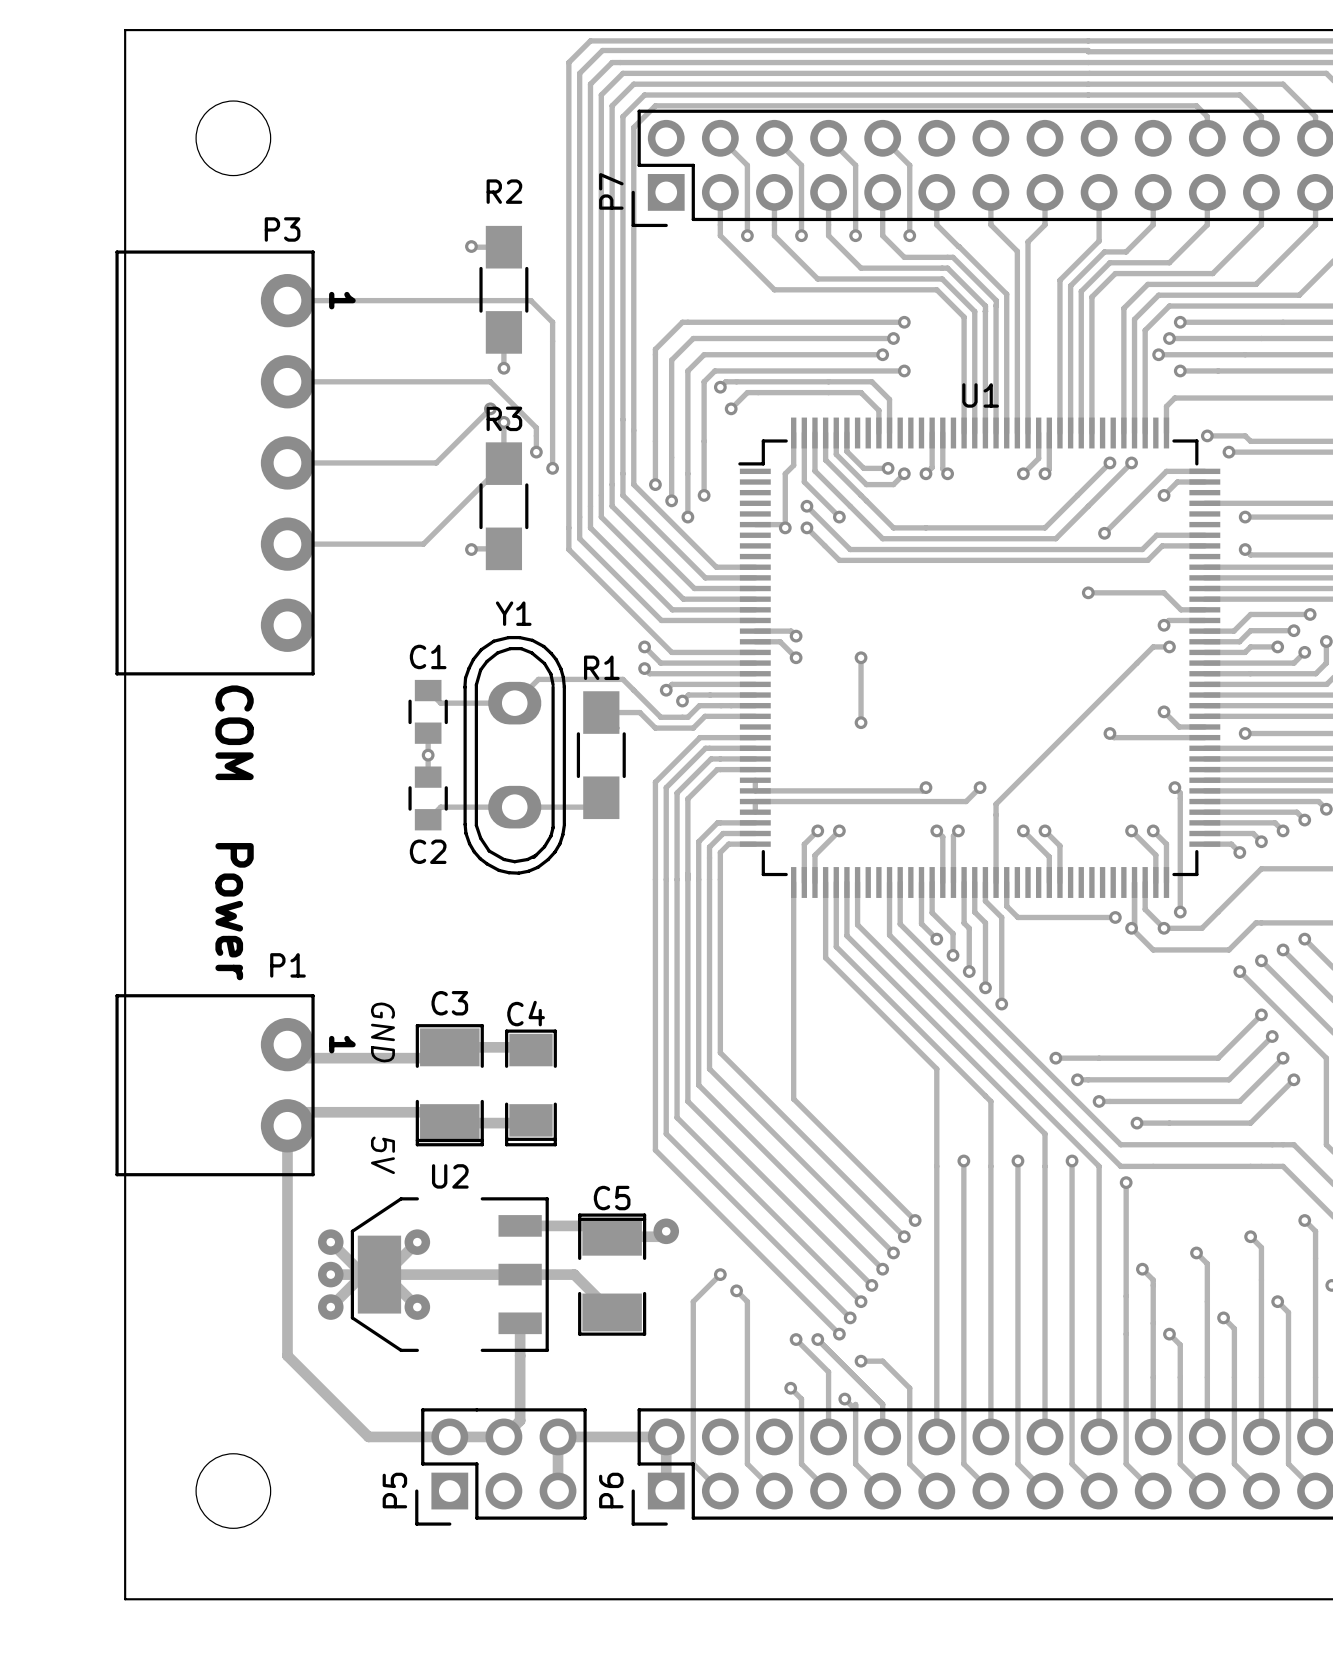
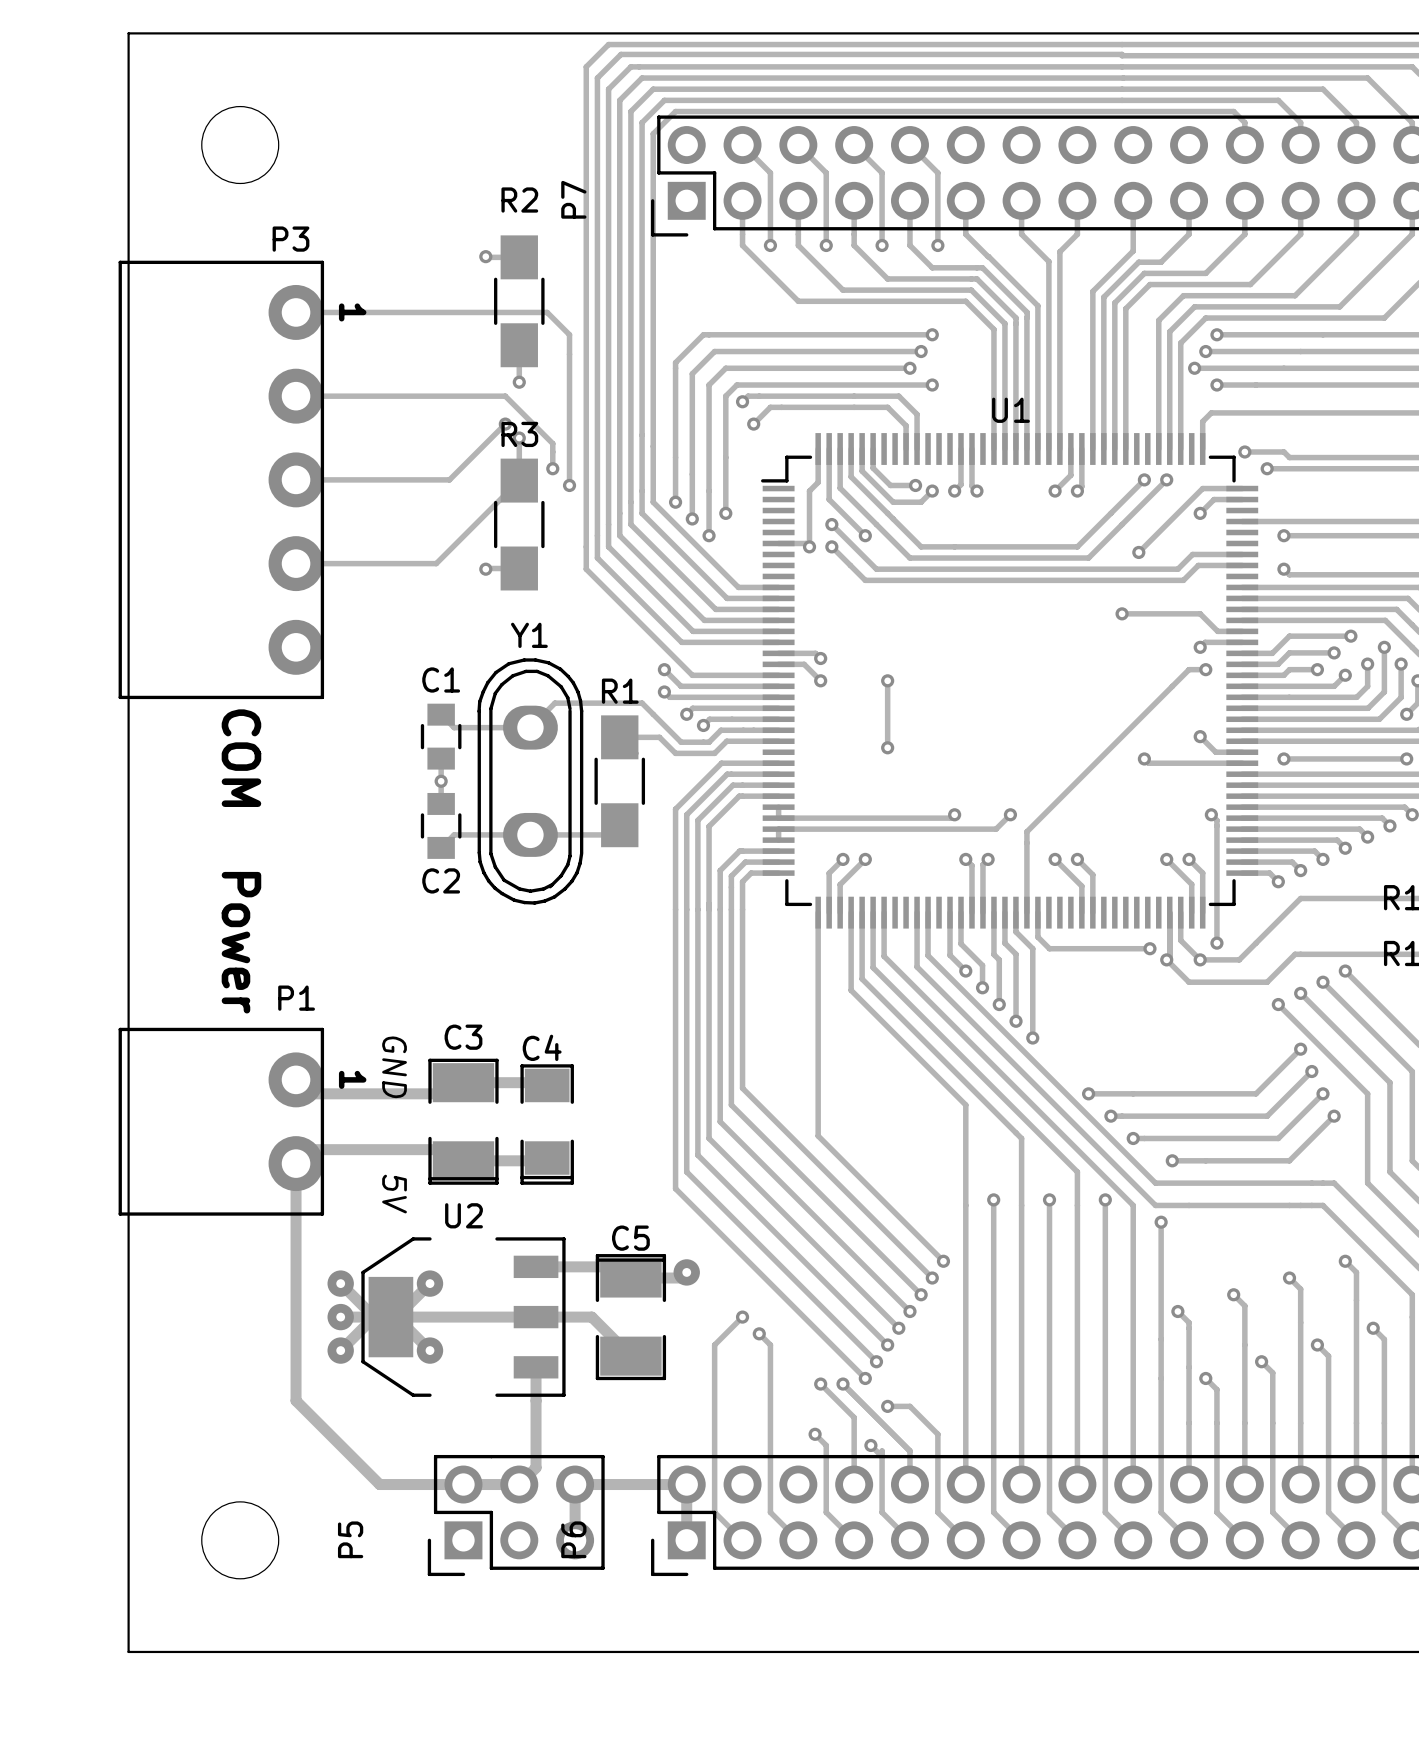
P7 name position: P7 (611, 191) -> P7 (573, 199)
P5 name position: P5 (394, 1490) -> P5 (350, 1539)
P6 name position: P6 (611, 1490) -> P6 (573, 1539)

